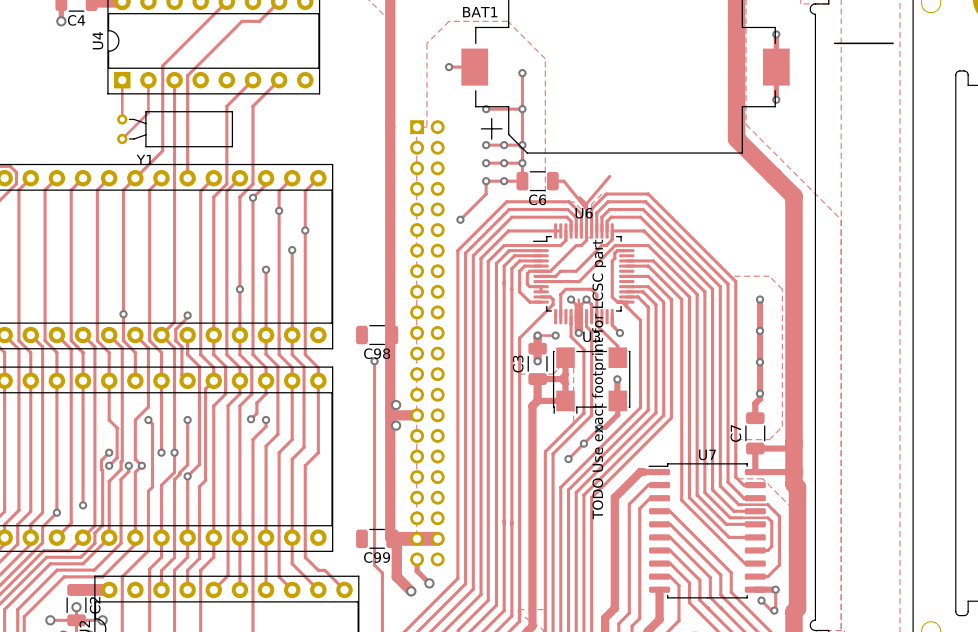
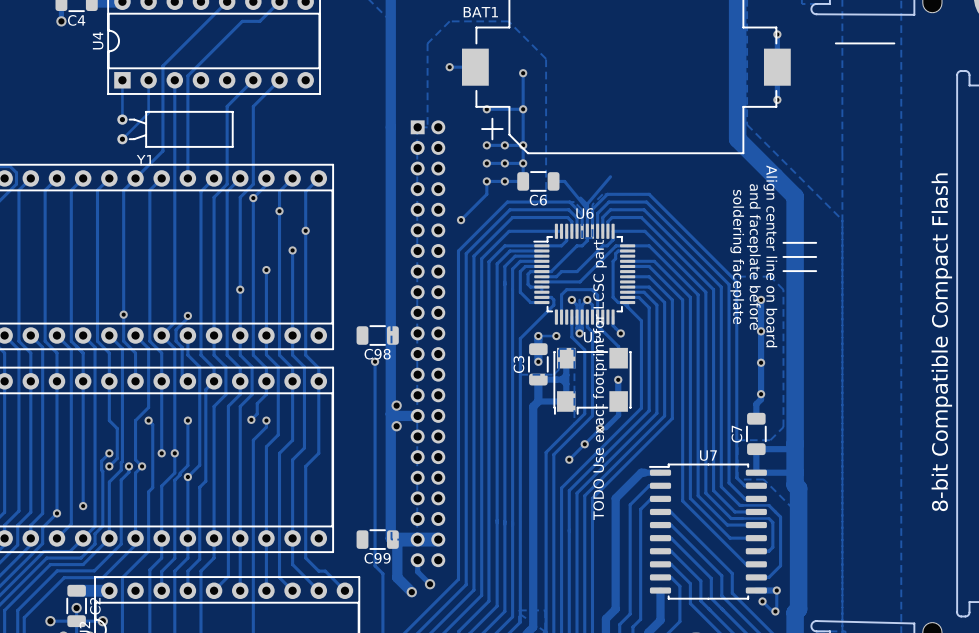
board edge: (815, 14) (815, 620) -> (816, 14) (914, 14)
board edge: (913, 14) (913, 622) -> (816, 621) (914, 623)
line: none -> (783, 242) (816, 242)
text: none -> soldering faceplate (737, 256)
text: none -> and faceplate before (753, 257)
text: none -> Align center line on board (770, 256)
line: none -> (783, 256) (816, 256)
line: none -> (783, 271) (816, 271)
text: none -> 8-bit Compatible Compact Flash (941, 342)

